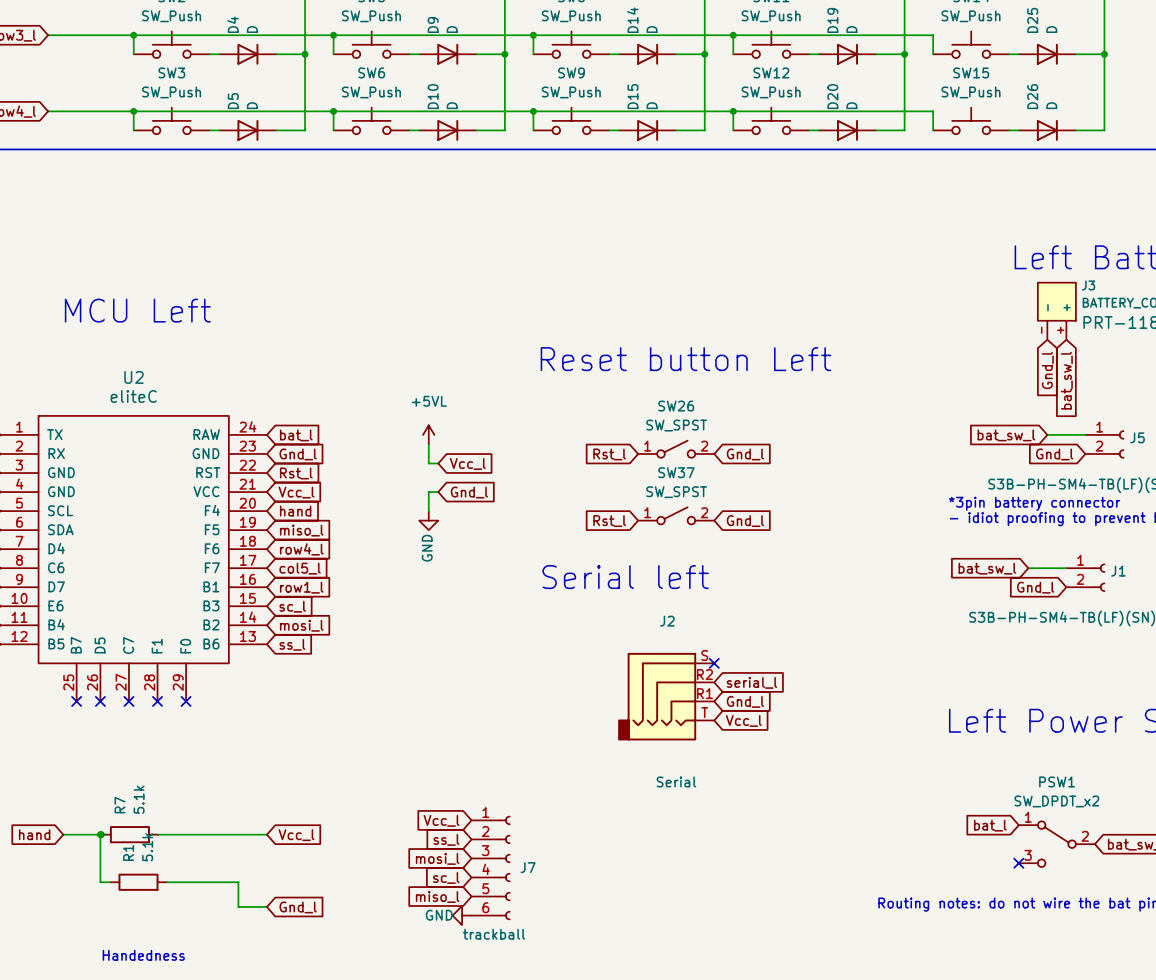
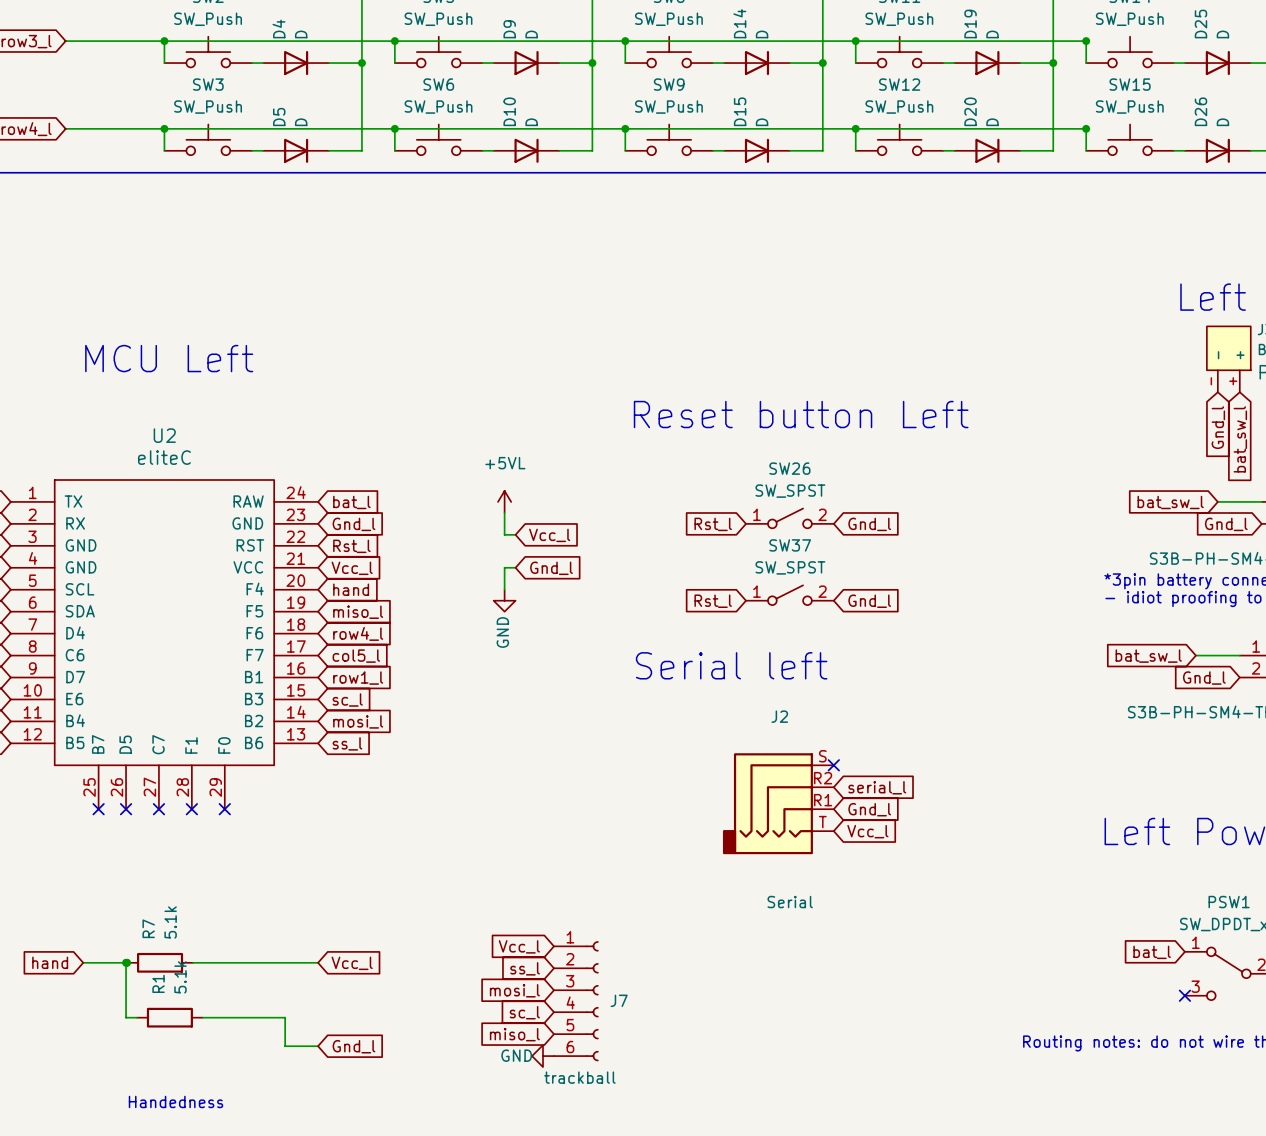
junction: none -> (1086, 41)
junction: none -> (1086, 128)

